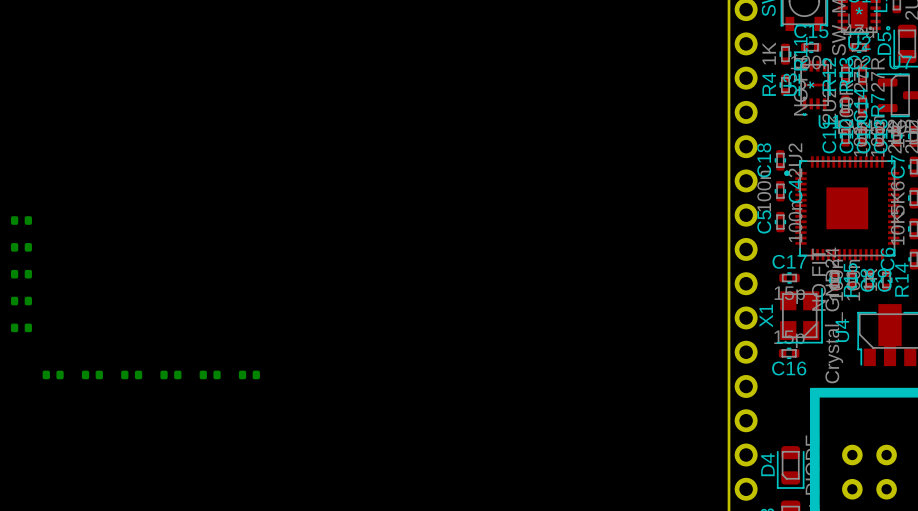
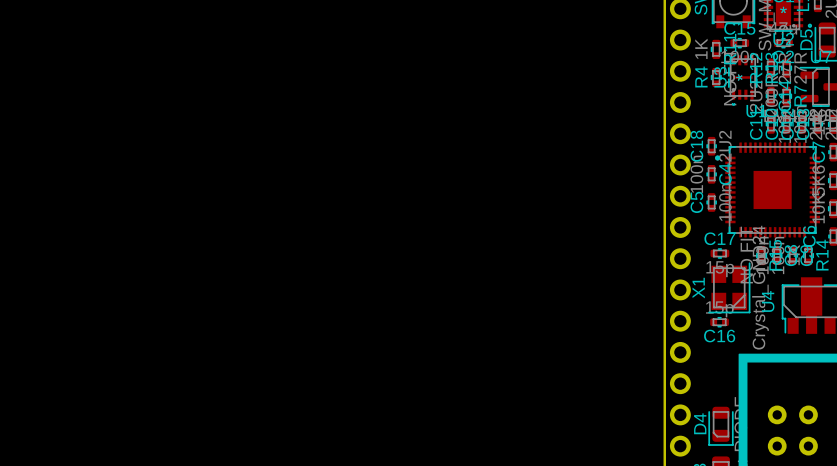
part: (21, 220) -> none
part: (21, 247) -> none
part: (21, 274) -> none
part: (21, 301) -> none
part: (21, 327) -> none
part: (53, 374) -> none
part: (92, 374) -> none
part: (131, 374) -> none
part: (170, 374) -> none
part: (210, 374) -> none
part: (249, 374) -> none

